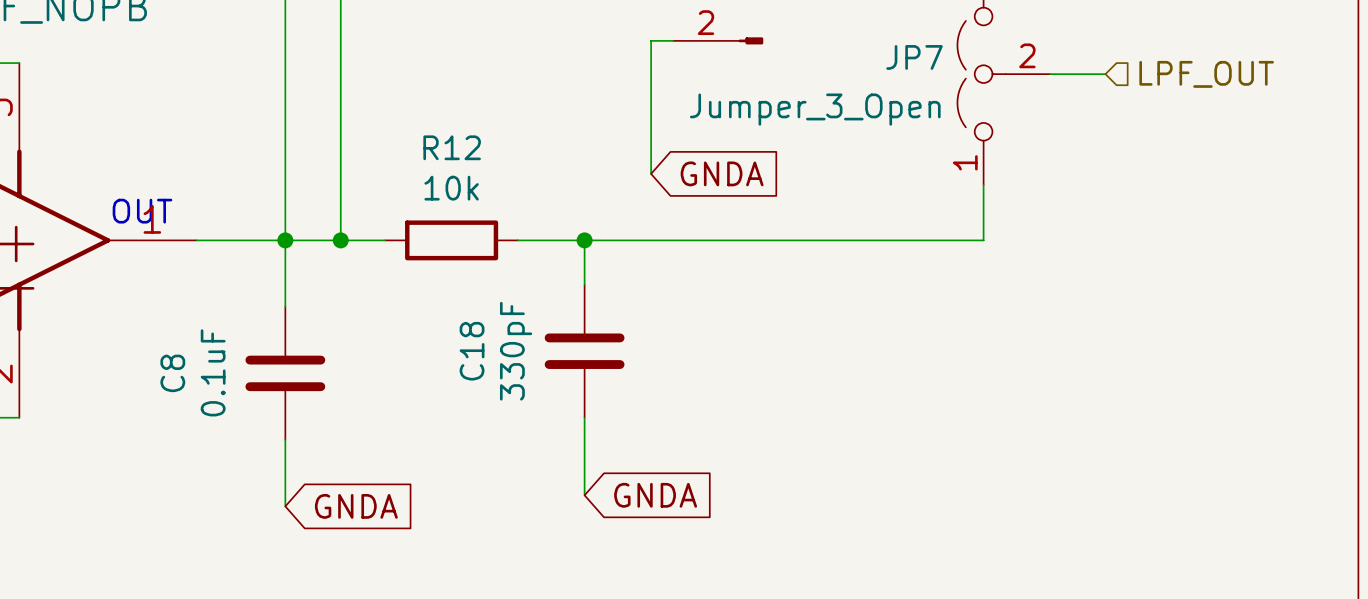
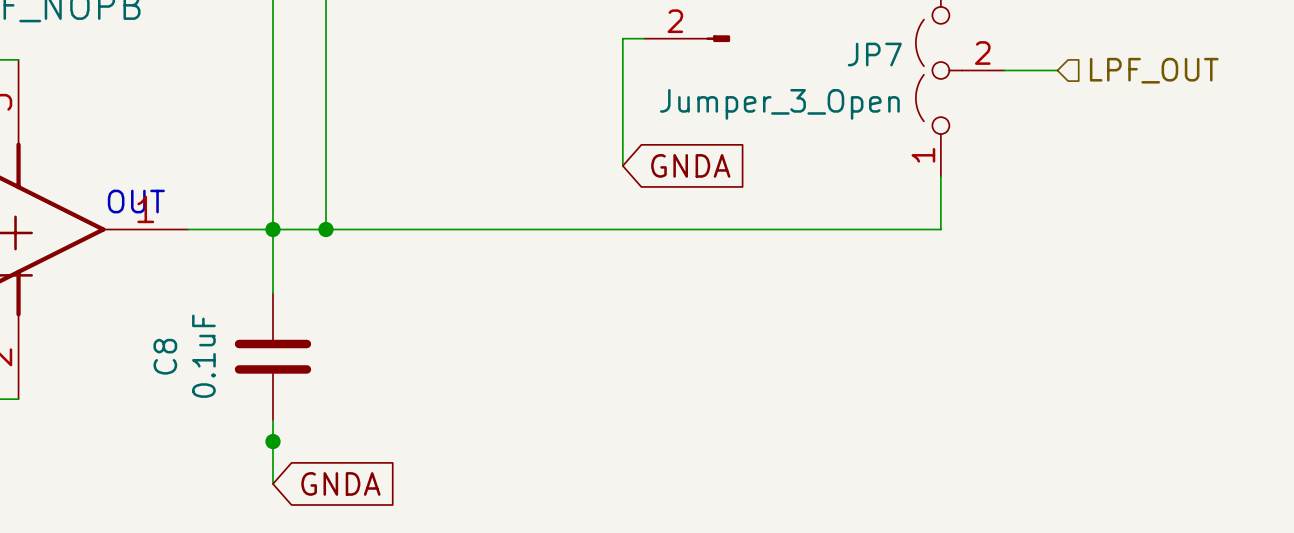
wire: none -> (368, 229) (495, 229)
R12: 10k (451, 240) -> none
wire: (584, 240) (584, 284) -> none
junction: (584, 240) -> none
C18: 330pF (584, 351) -> none
wire: (584, 417) (584, 495) -> none
junction: none -> (272, 441)
global label: GNDA (655, 495) -> none

